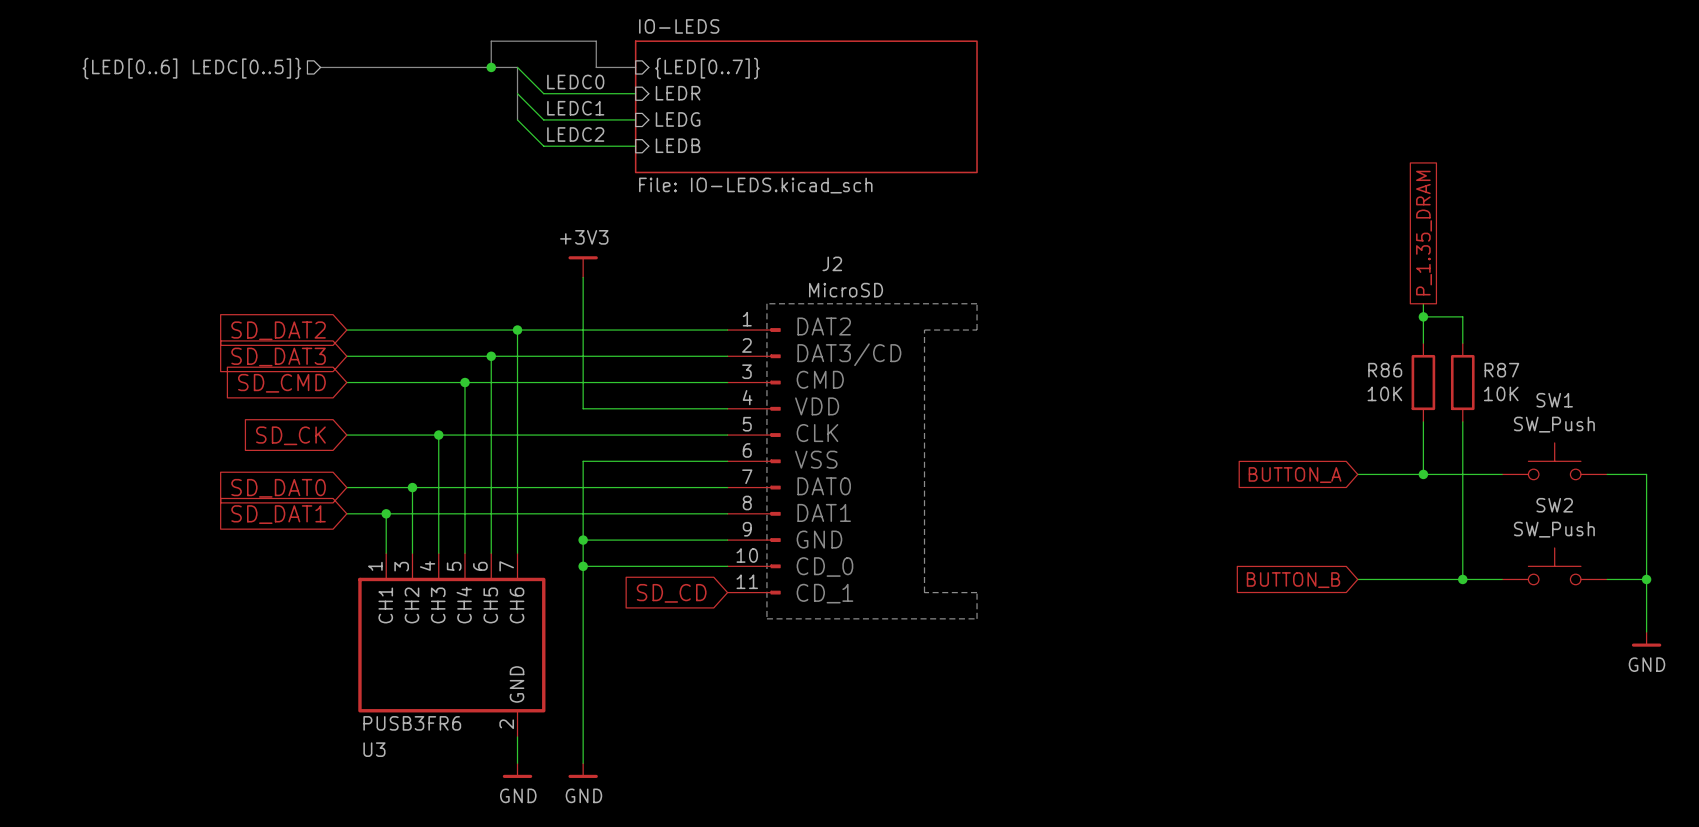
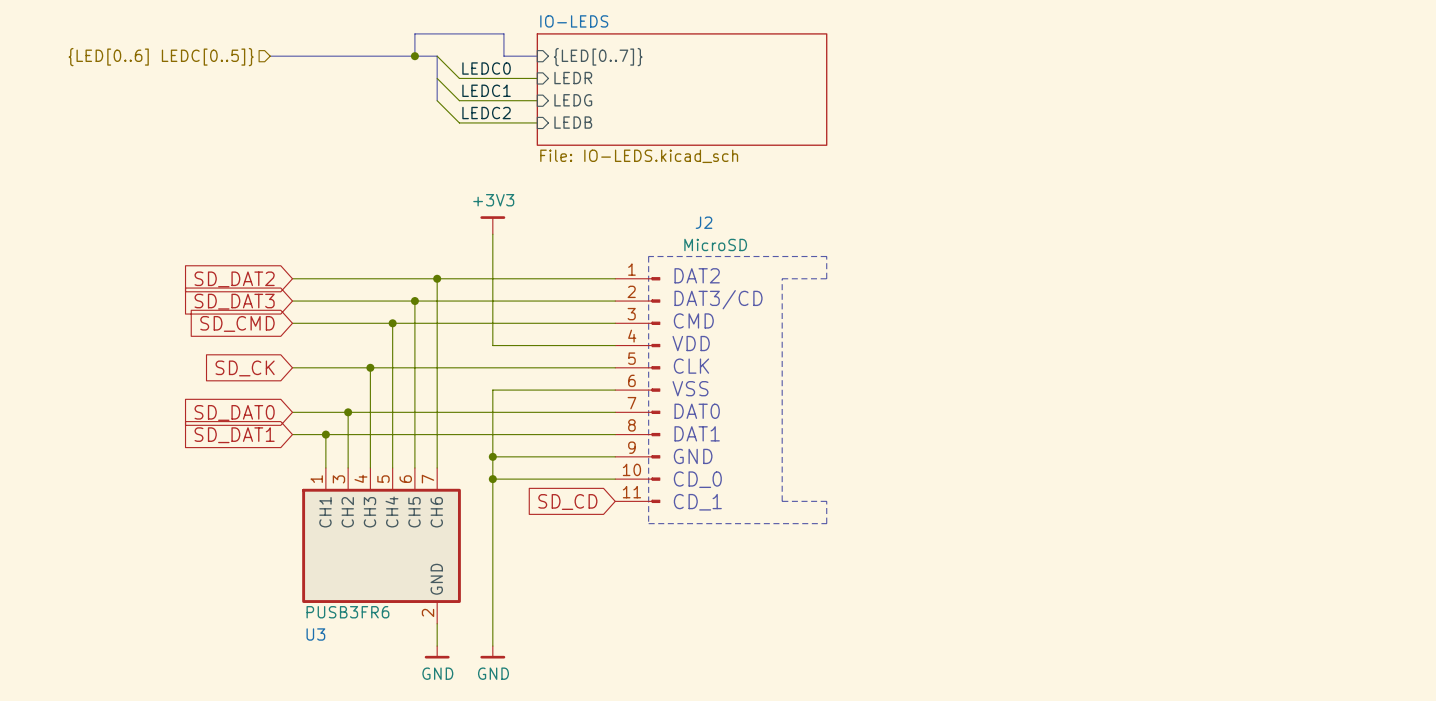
global label: P_1.35_DRAM (1424, 233) -> none
wire: (1423, 303) (1423, 343) -> none
wire: (1423, 316) (1462, 316) (1462, 343) -> none
junction: (1423, 316) -> none
R86: 10K (1423, 382) -> none
R87: 10K (1462, 382) -> none
wire: (1423, 421) (1423, 474) -> none
wire: (1462, 421) (1462, 579) -> none
SW1: SW_Push (1554, 461) -> none
wire: (1357, 474) (1502, 474) -> none
junction: (1423, 474) -> none
wire: (1607, 474) (1646, 474) (1646, 631) -> none
global label: BUTTON_A (1295, 475) -> none
SW2: SW_Push (1554, 566) -> none
wire: (1357, 579) (1502, 579) -> none
junction: (1462, 579) -> none
wire: (1607, 579) (1646, 579) -> none
junction: (1646, 579) -> none
global label: BUTTON_B (1293, 580) -> none
power symbol: GND (1646, 639) -> none

